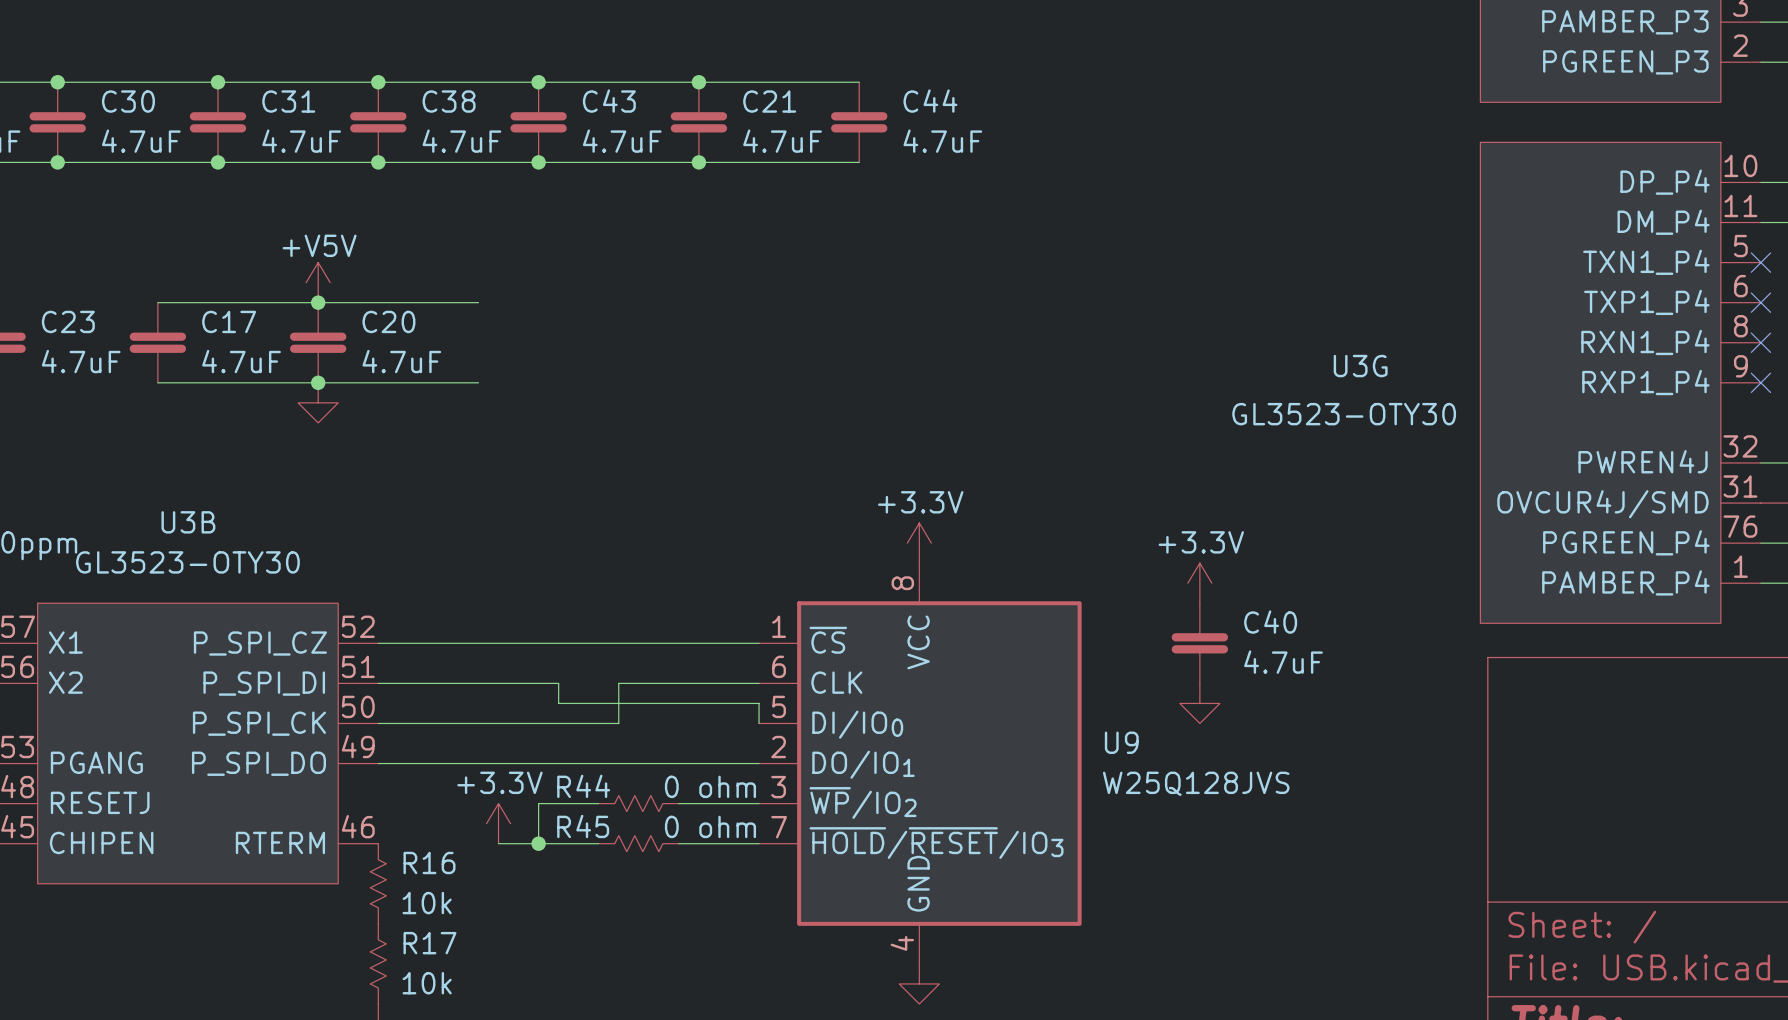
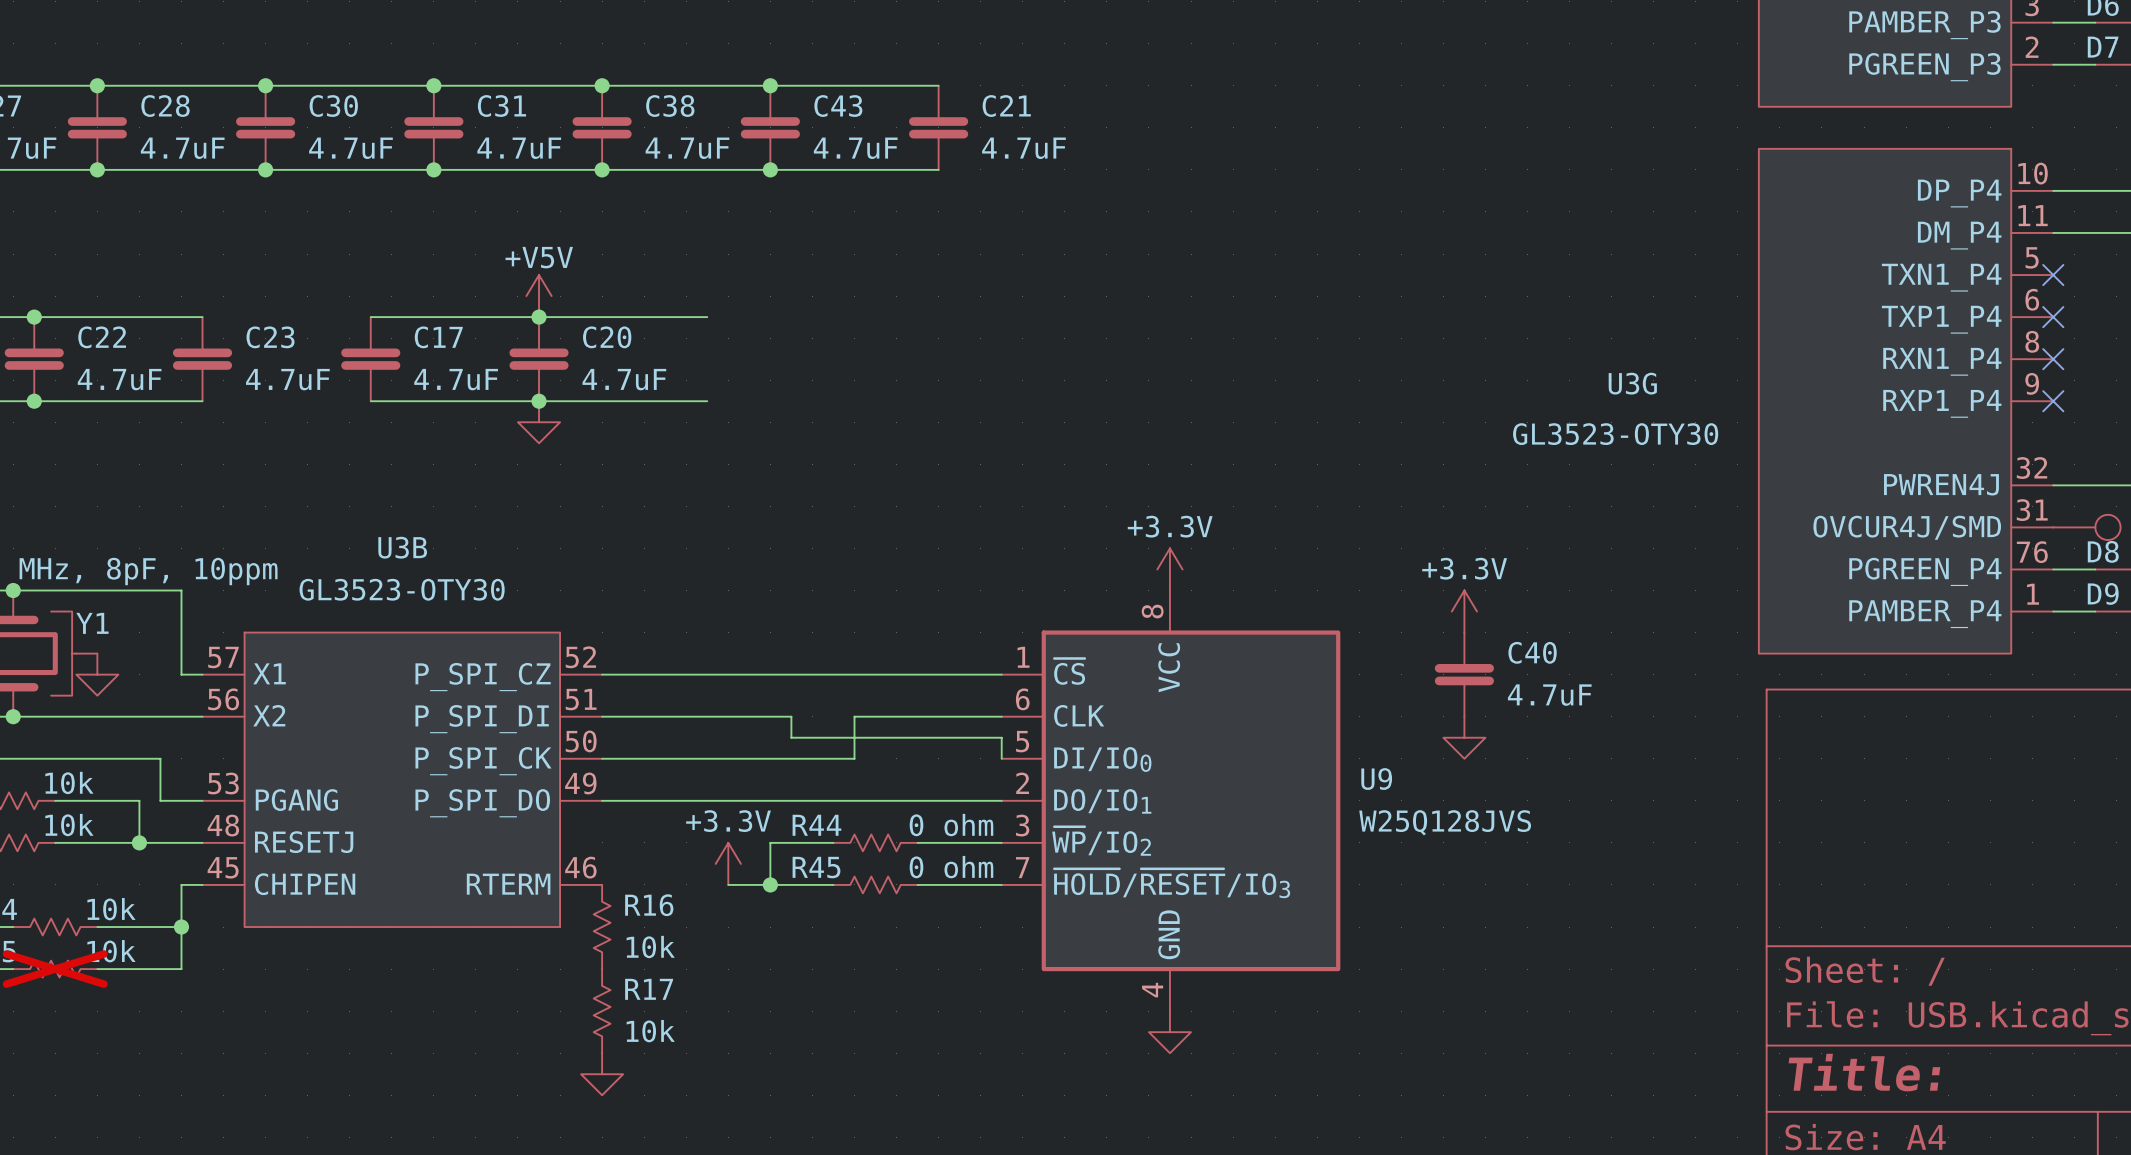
wire: (698, 82) (859, 82) -> none
junction: (698, 82) -> none
C44: (859, 122) -> none
wire: (698, 162) (859, 162) -> none
junction: (698, 162) -> none

